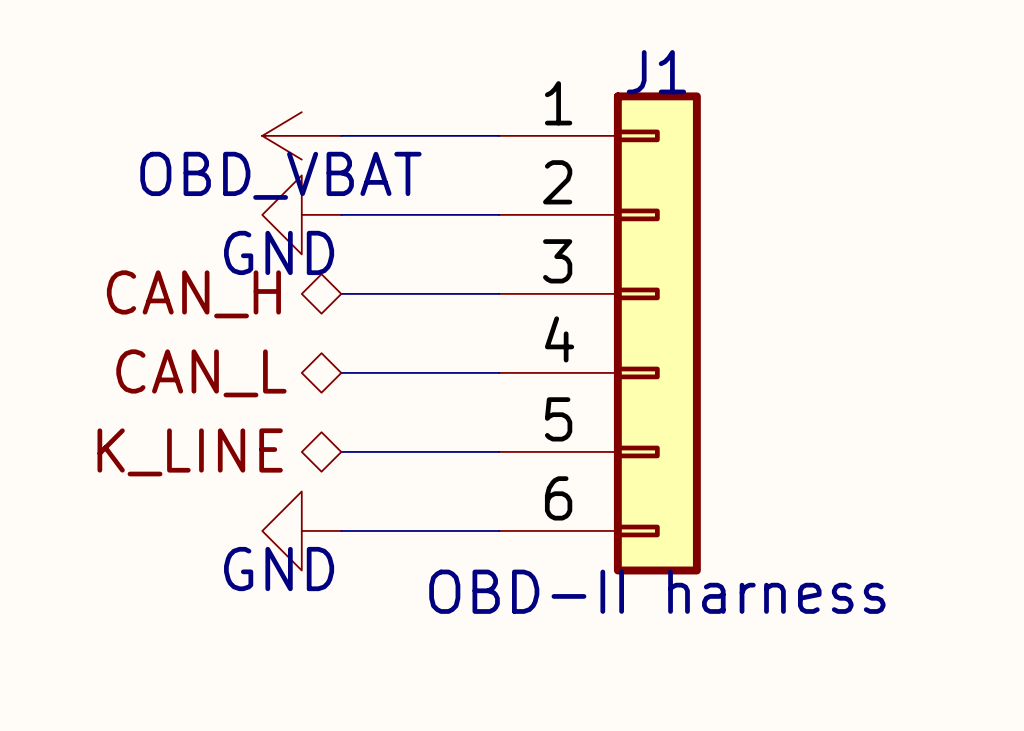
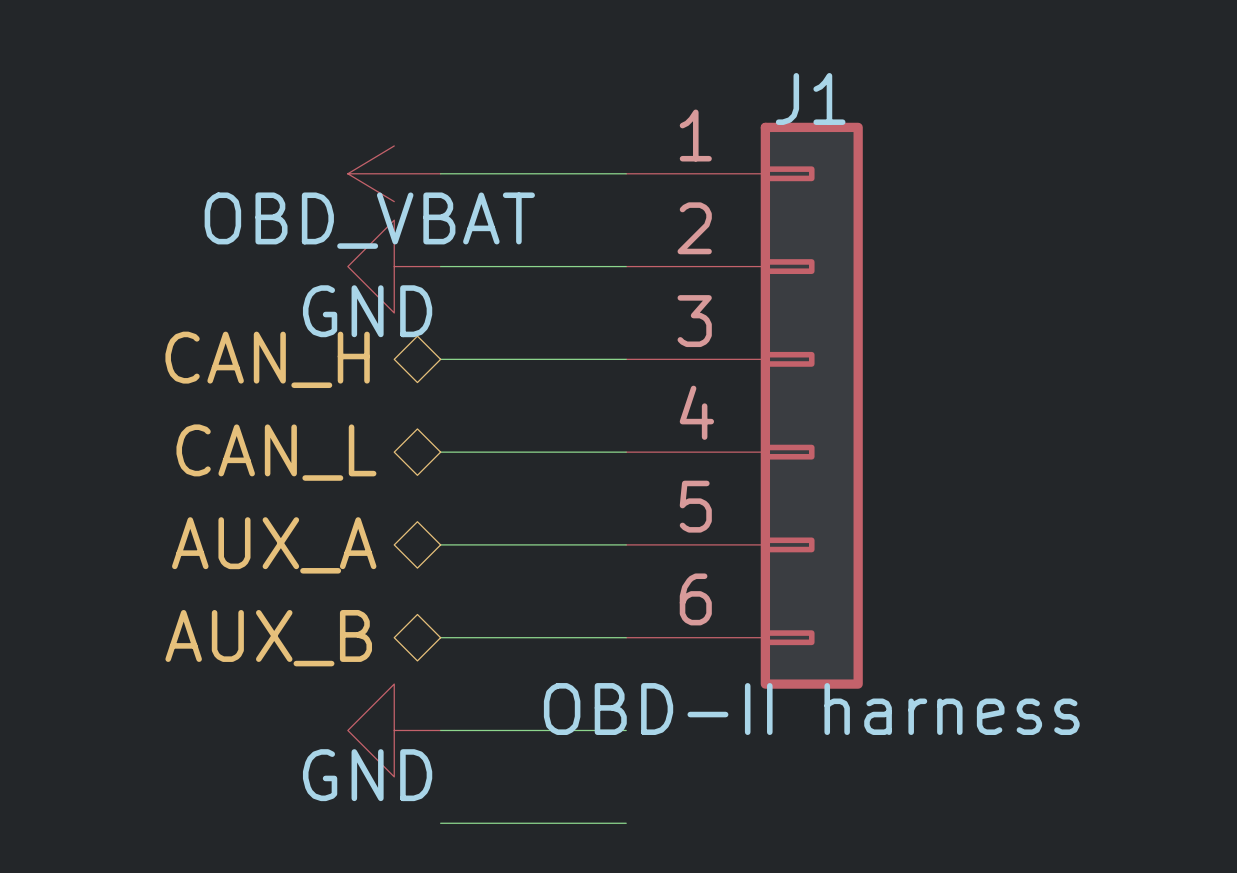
hierarchical label: K_LINE (190, 452) -> AUX_A (274, 545)
power symbol position: GND (301, 530) -> GND (394, 730)
hierarchical label: none -> AUX_B (268, 638)
wire: none -> (440, 730) (626, 730)
wire: none -> (440, 823) (626, 823)

